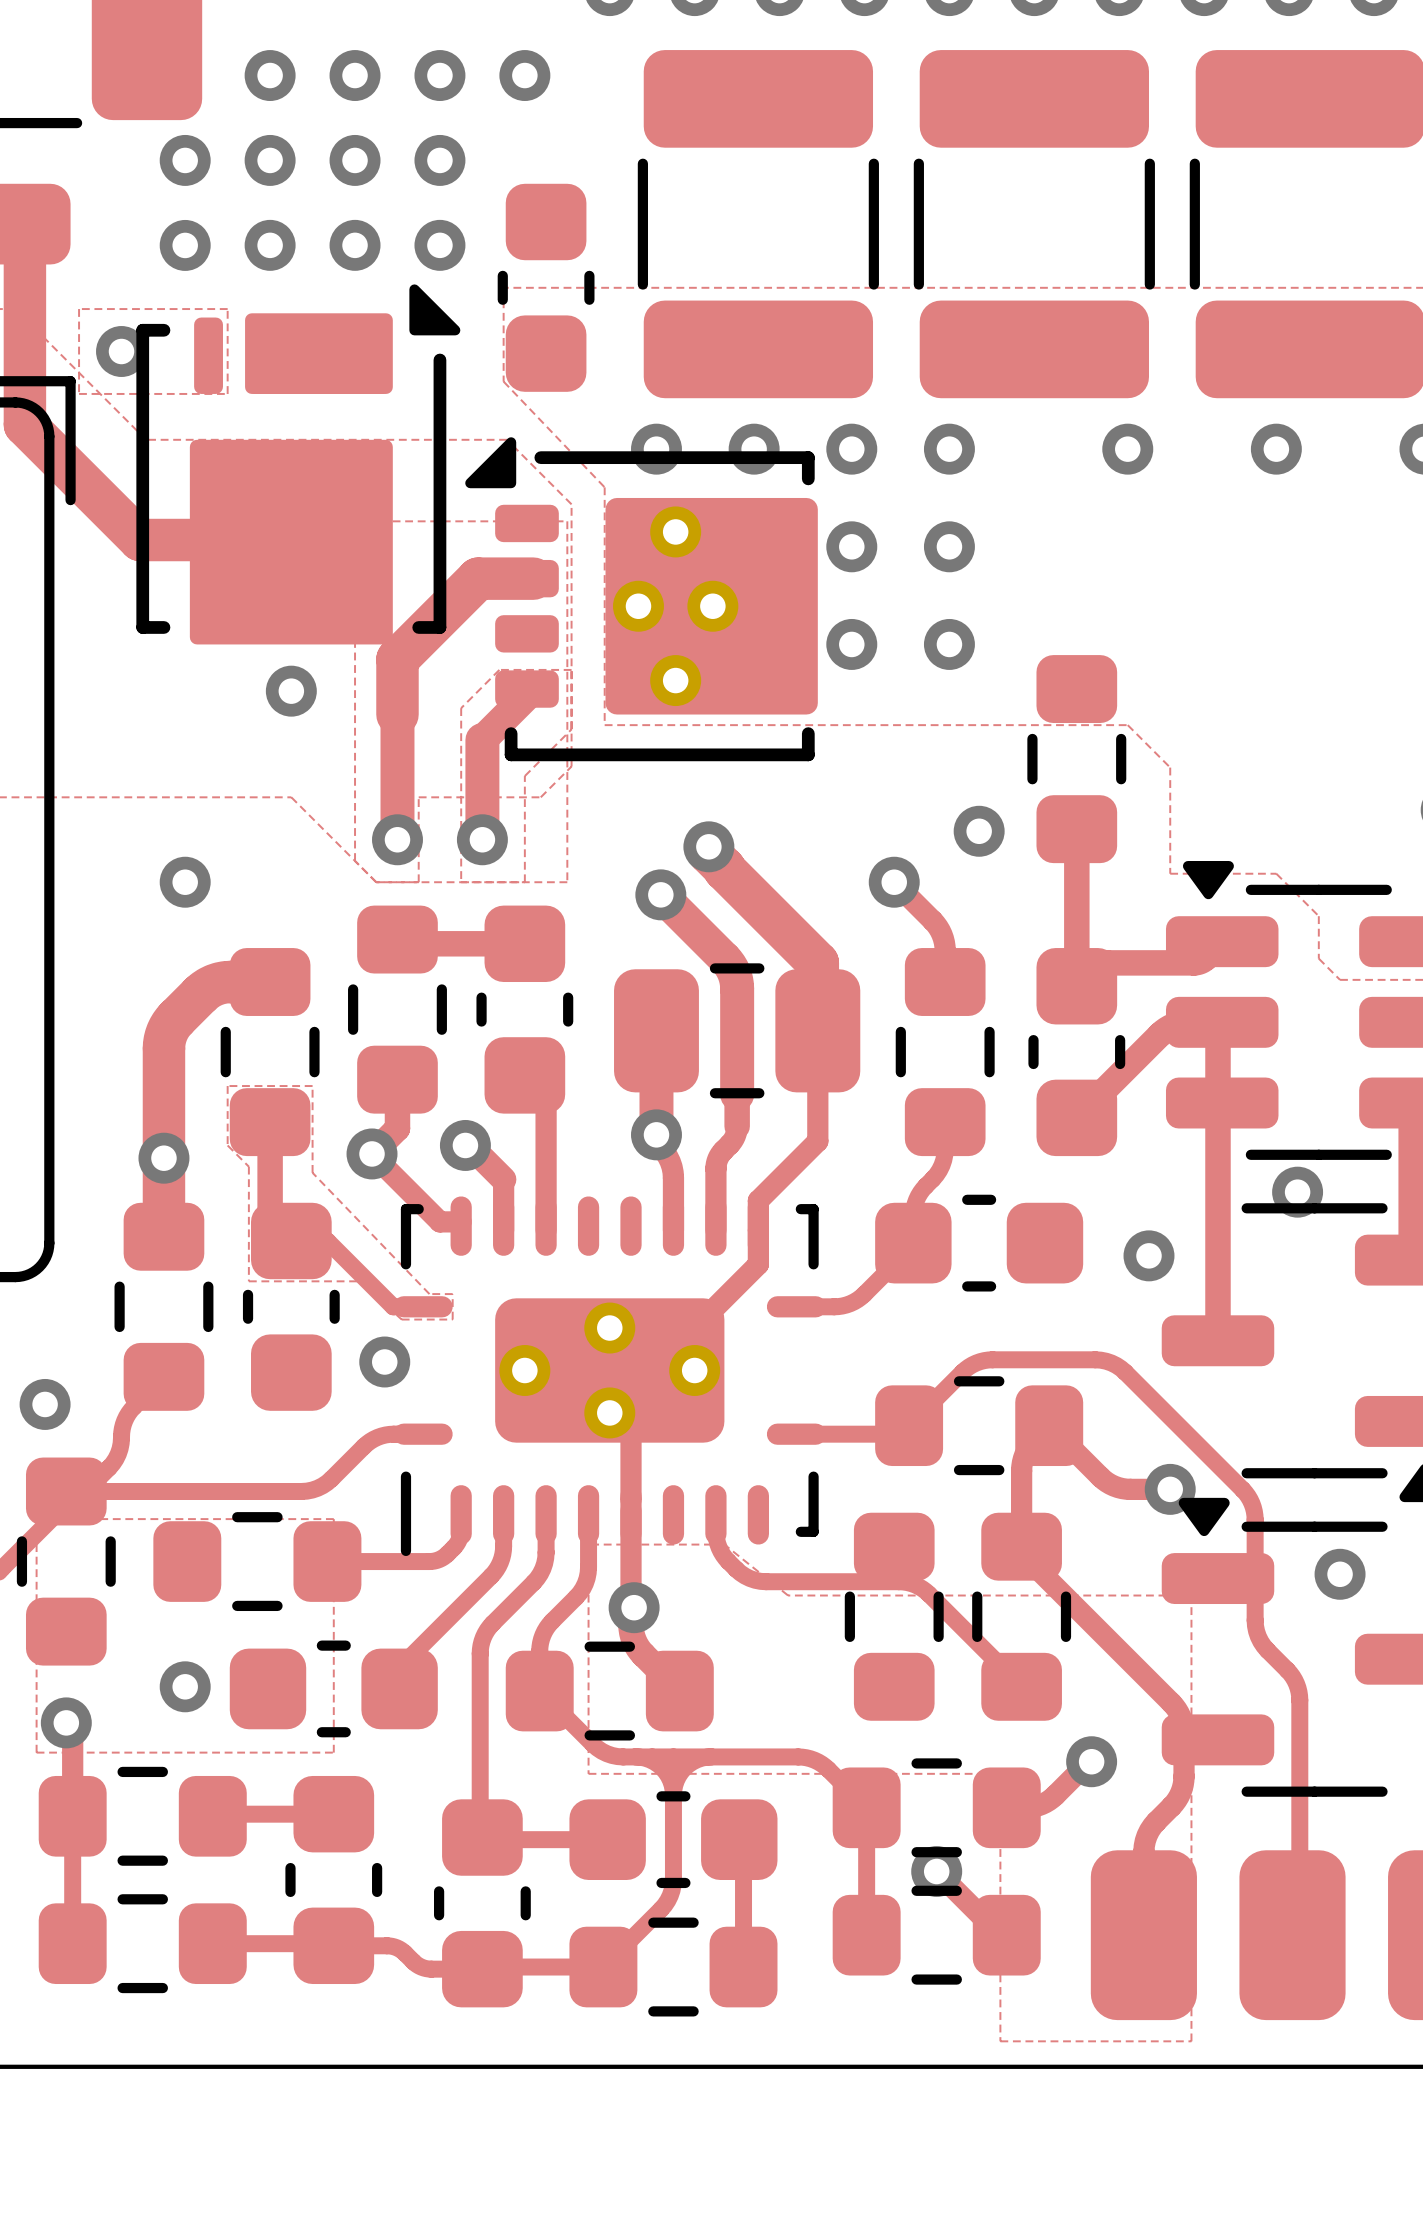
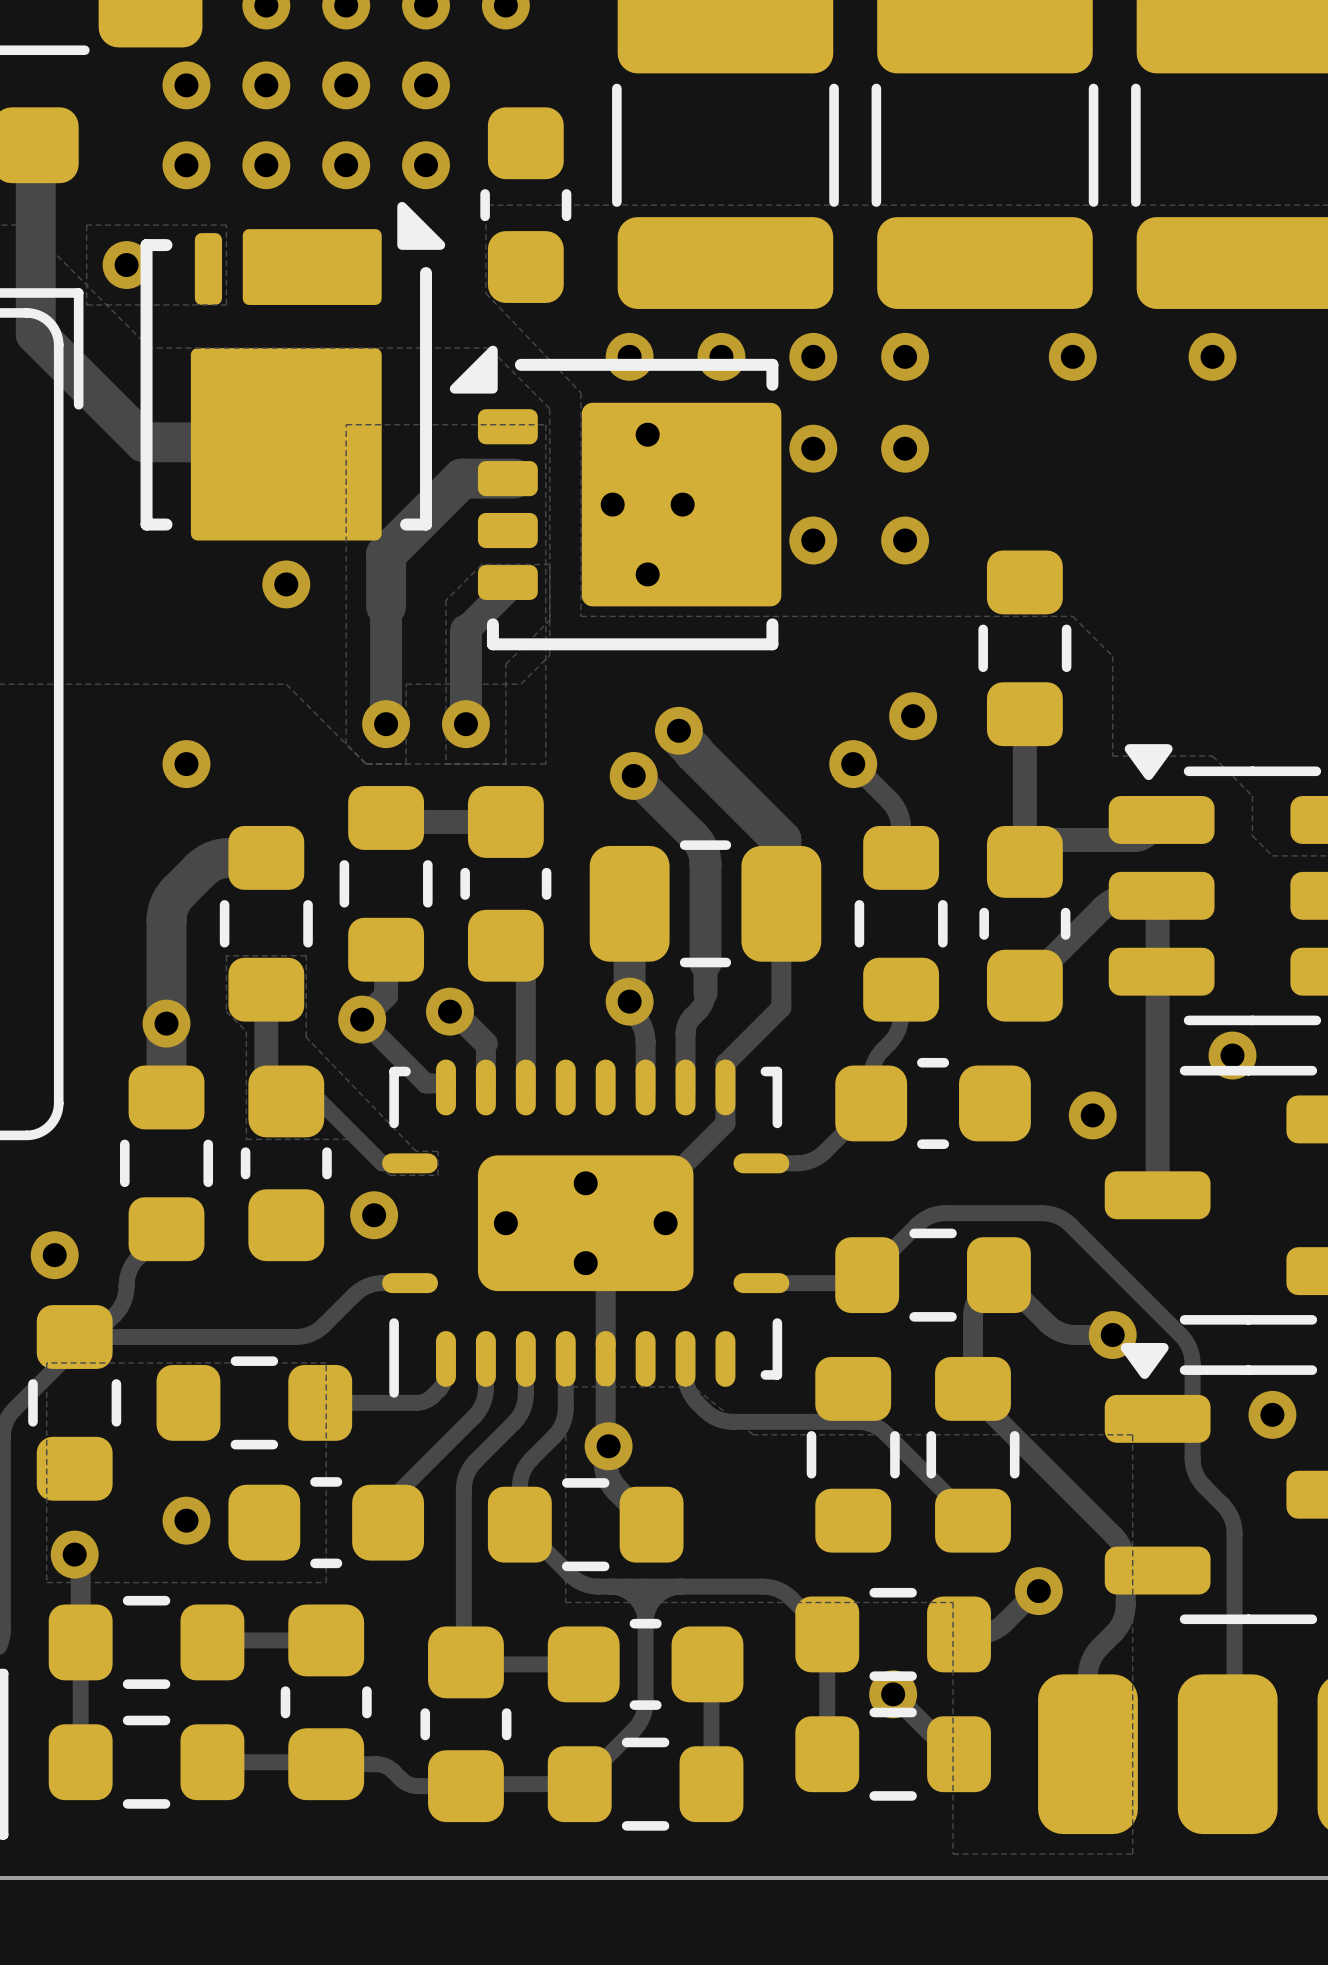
via position: (979, 831) -> (913, 716)

